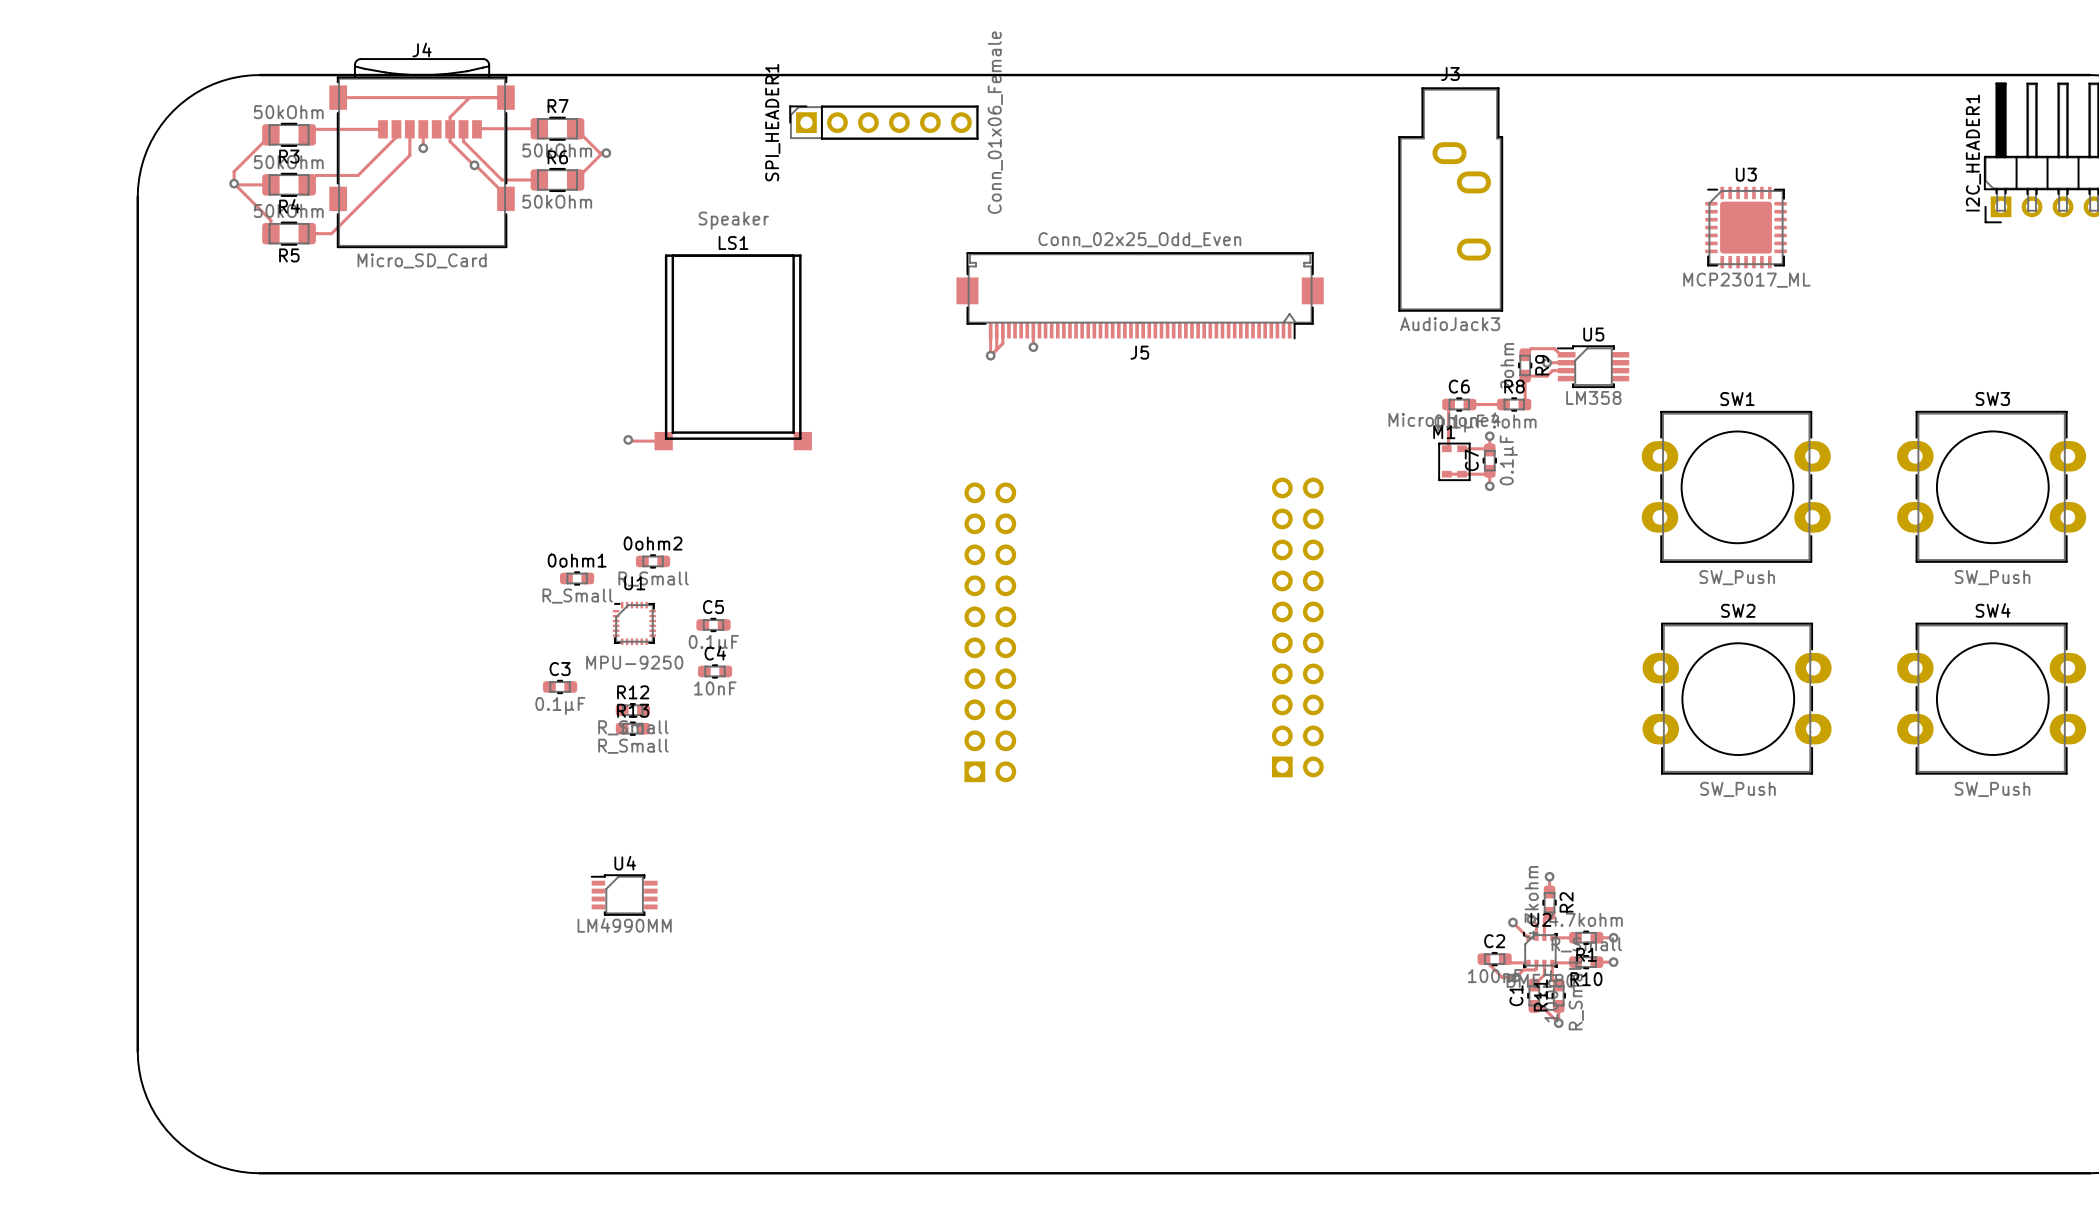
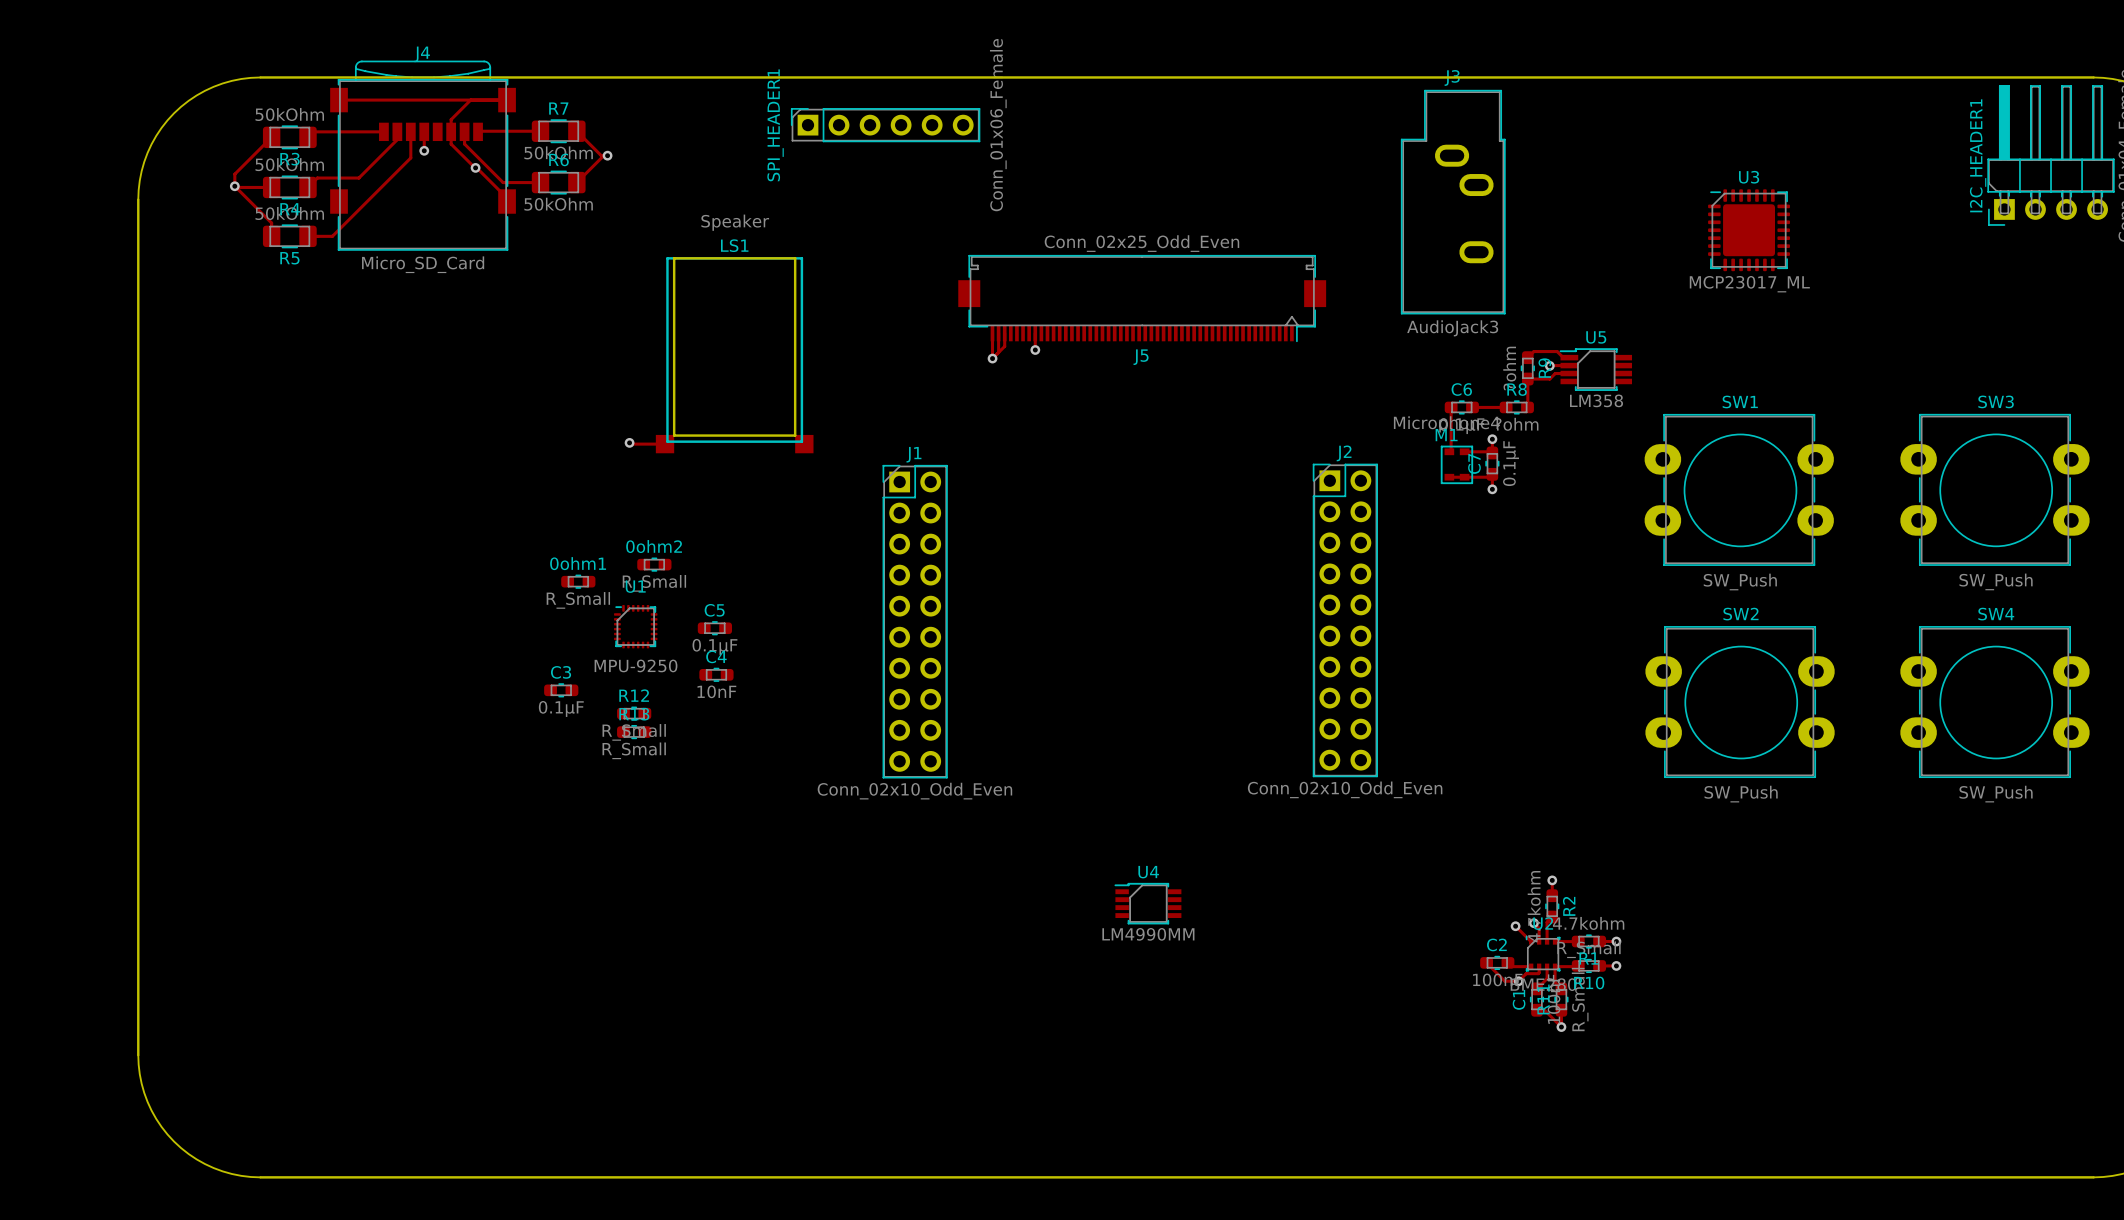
J2 side: bottom (1297, 627) -> top (1345, 620)
J1 side: bottom (990, 632) -> top (915, 621)
U4 position: (624, 895) -> (1147, 903)

